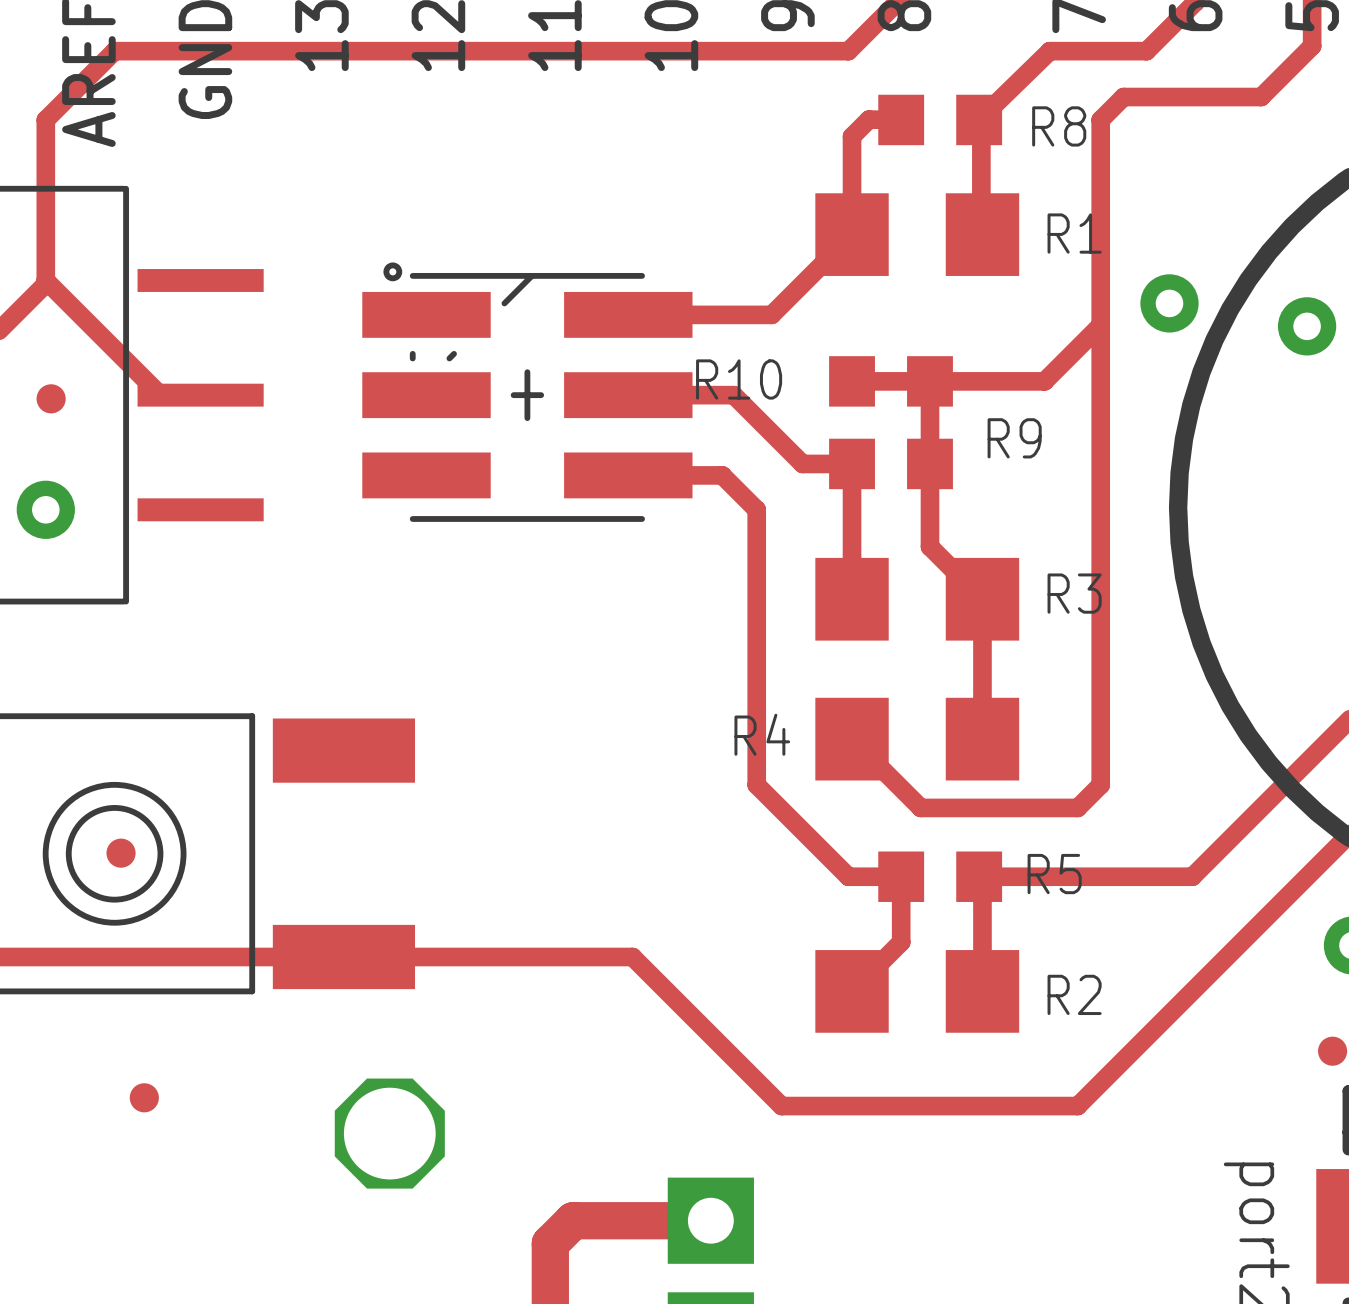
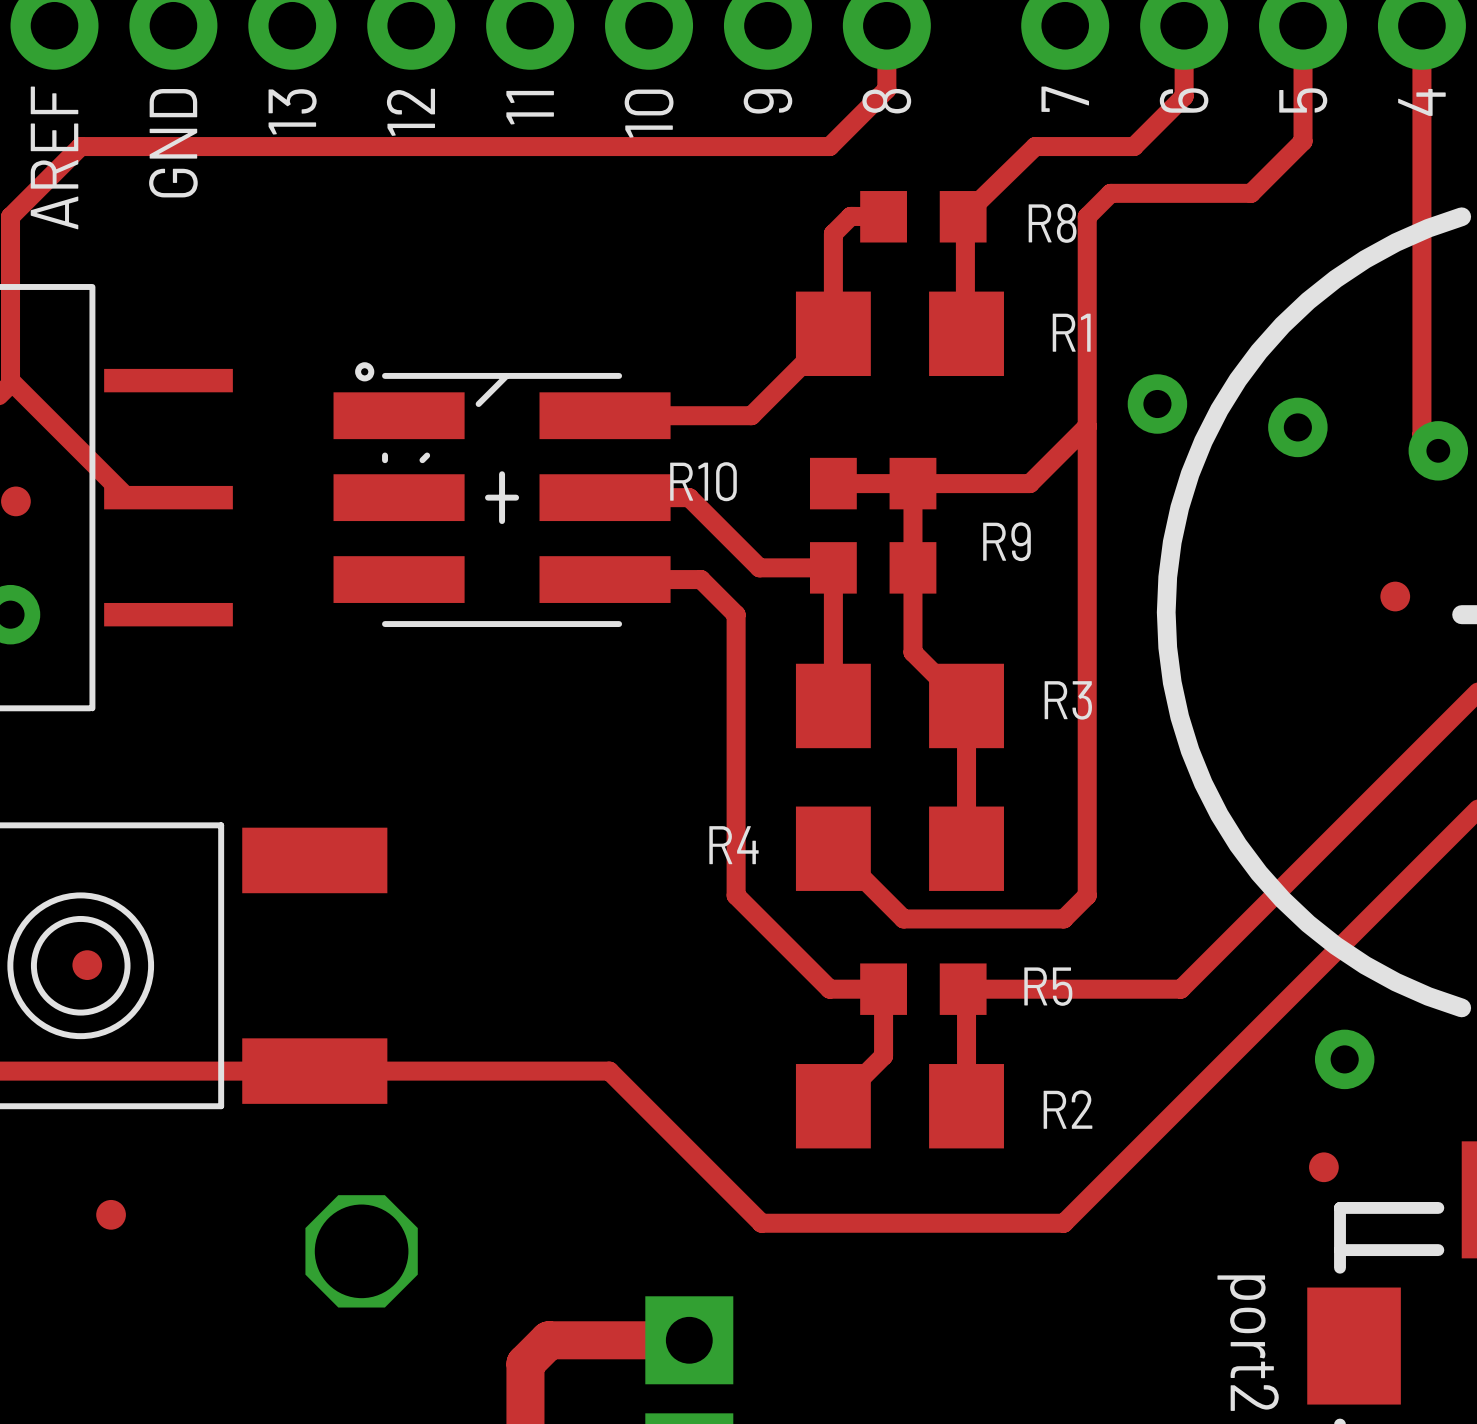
track: (710, 395) (733, 395) (802, 463) -> (689, 497) (759, 567) (782, 567)

